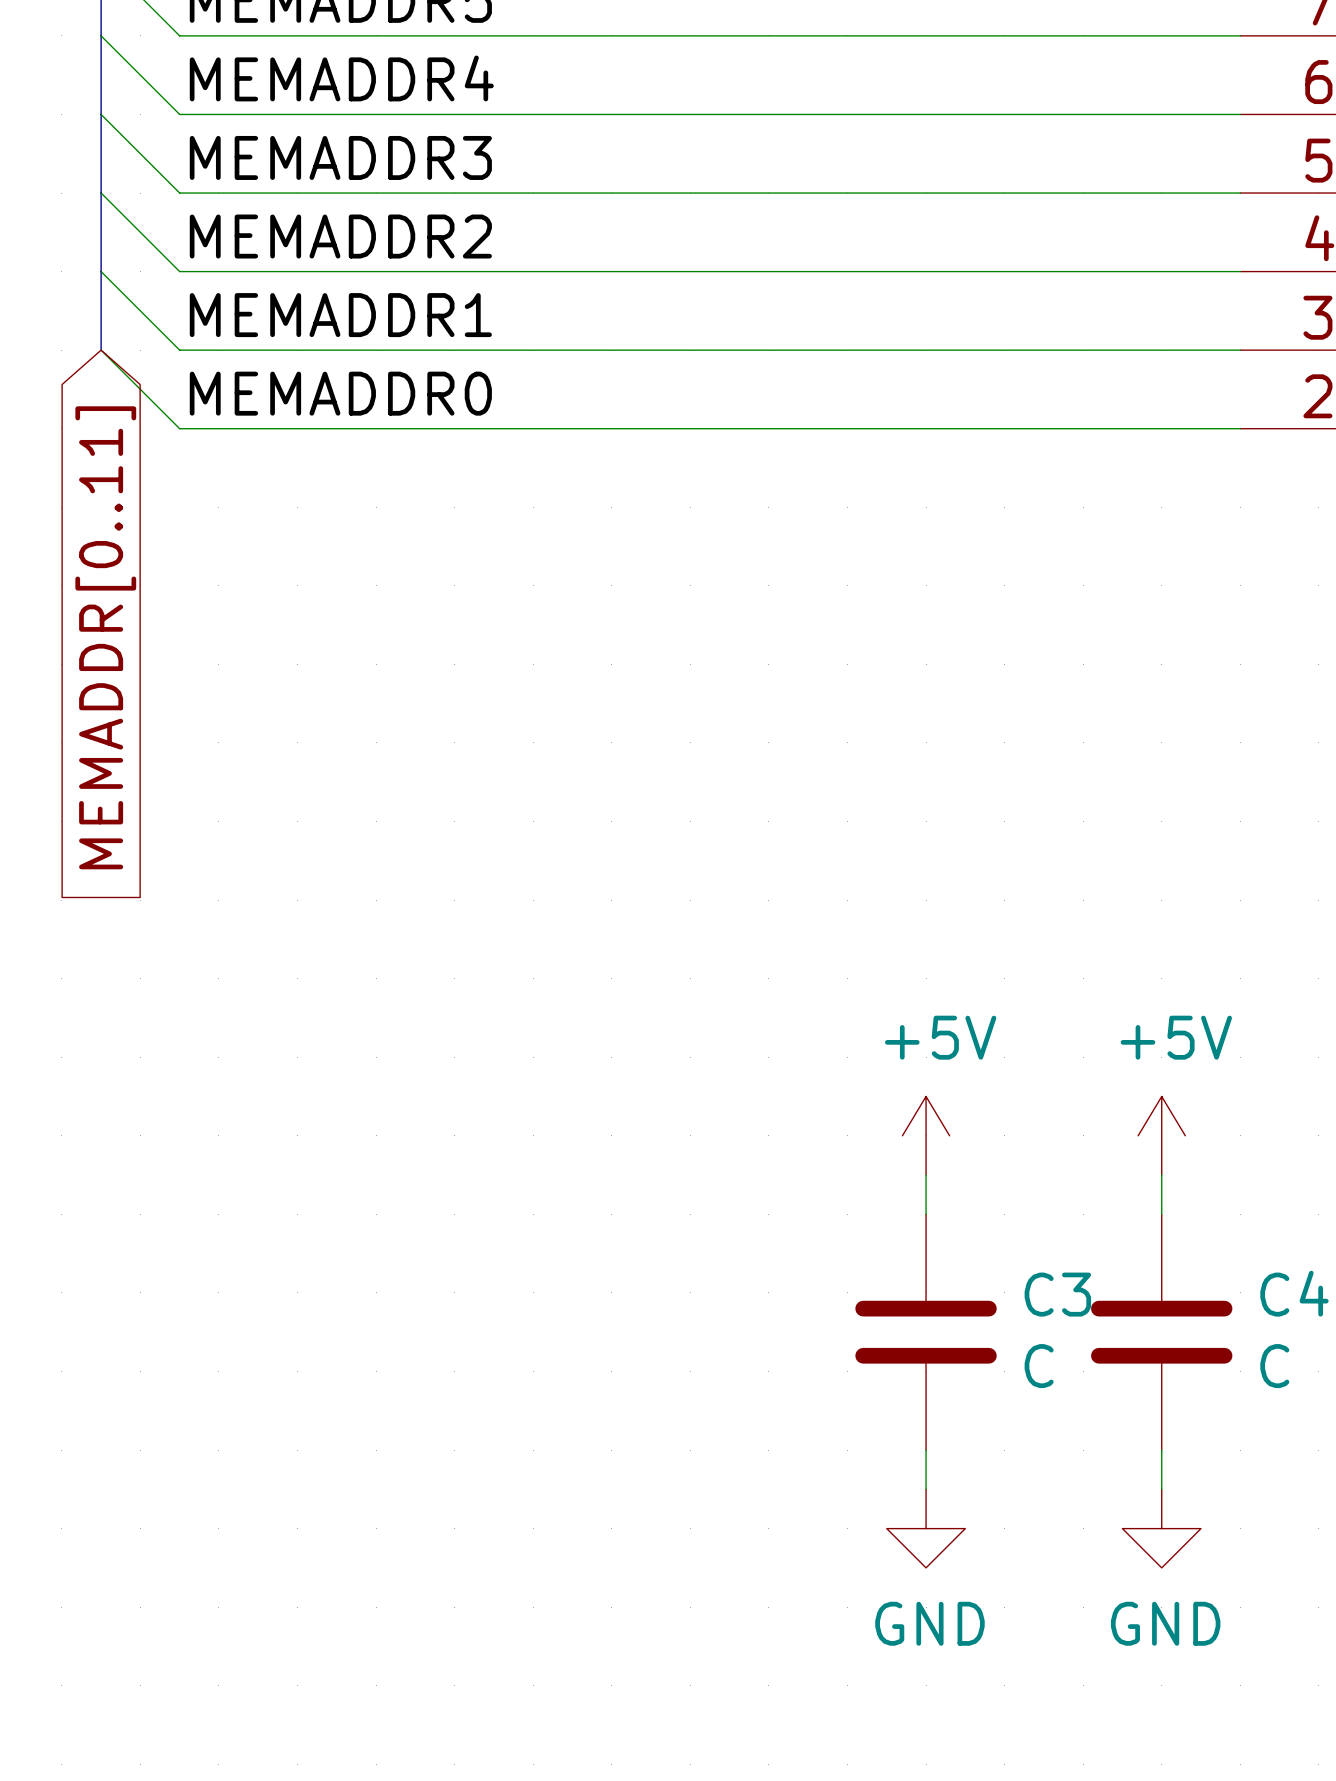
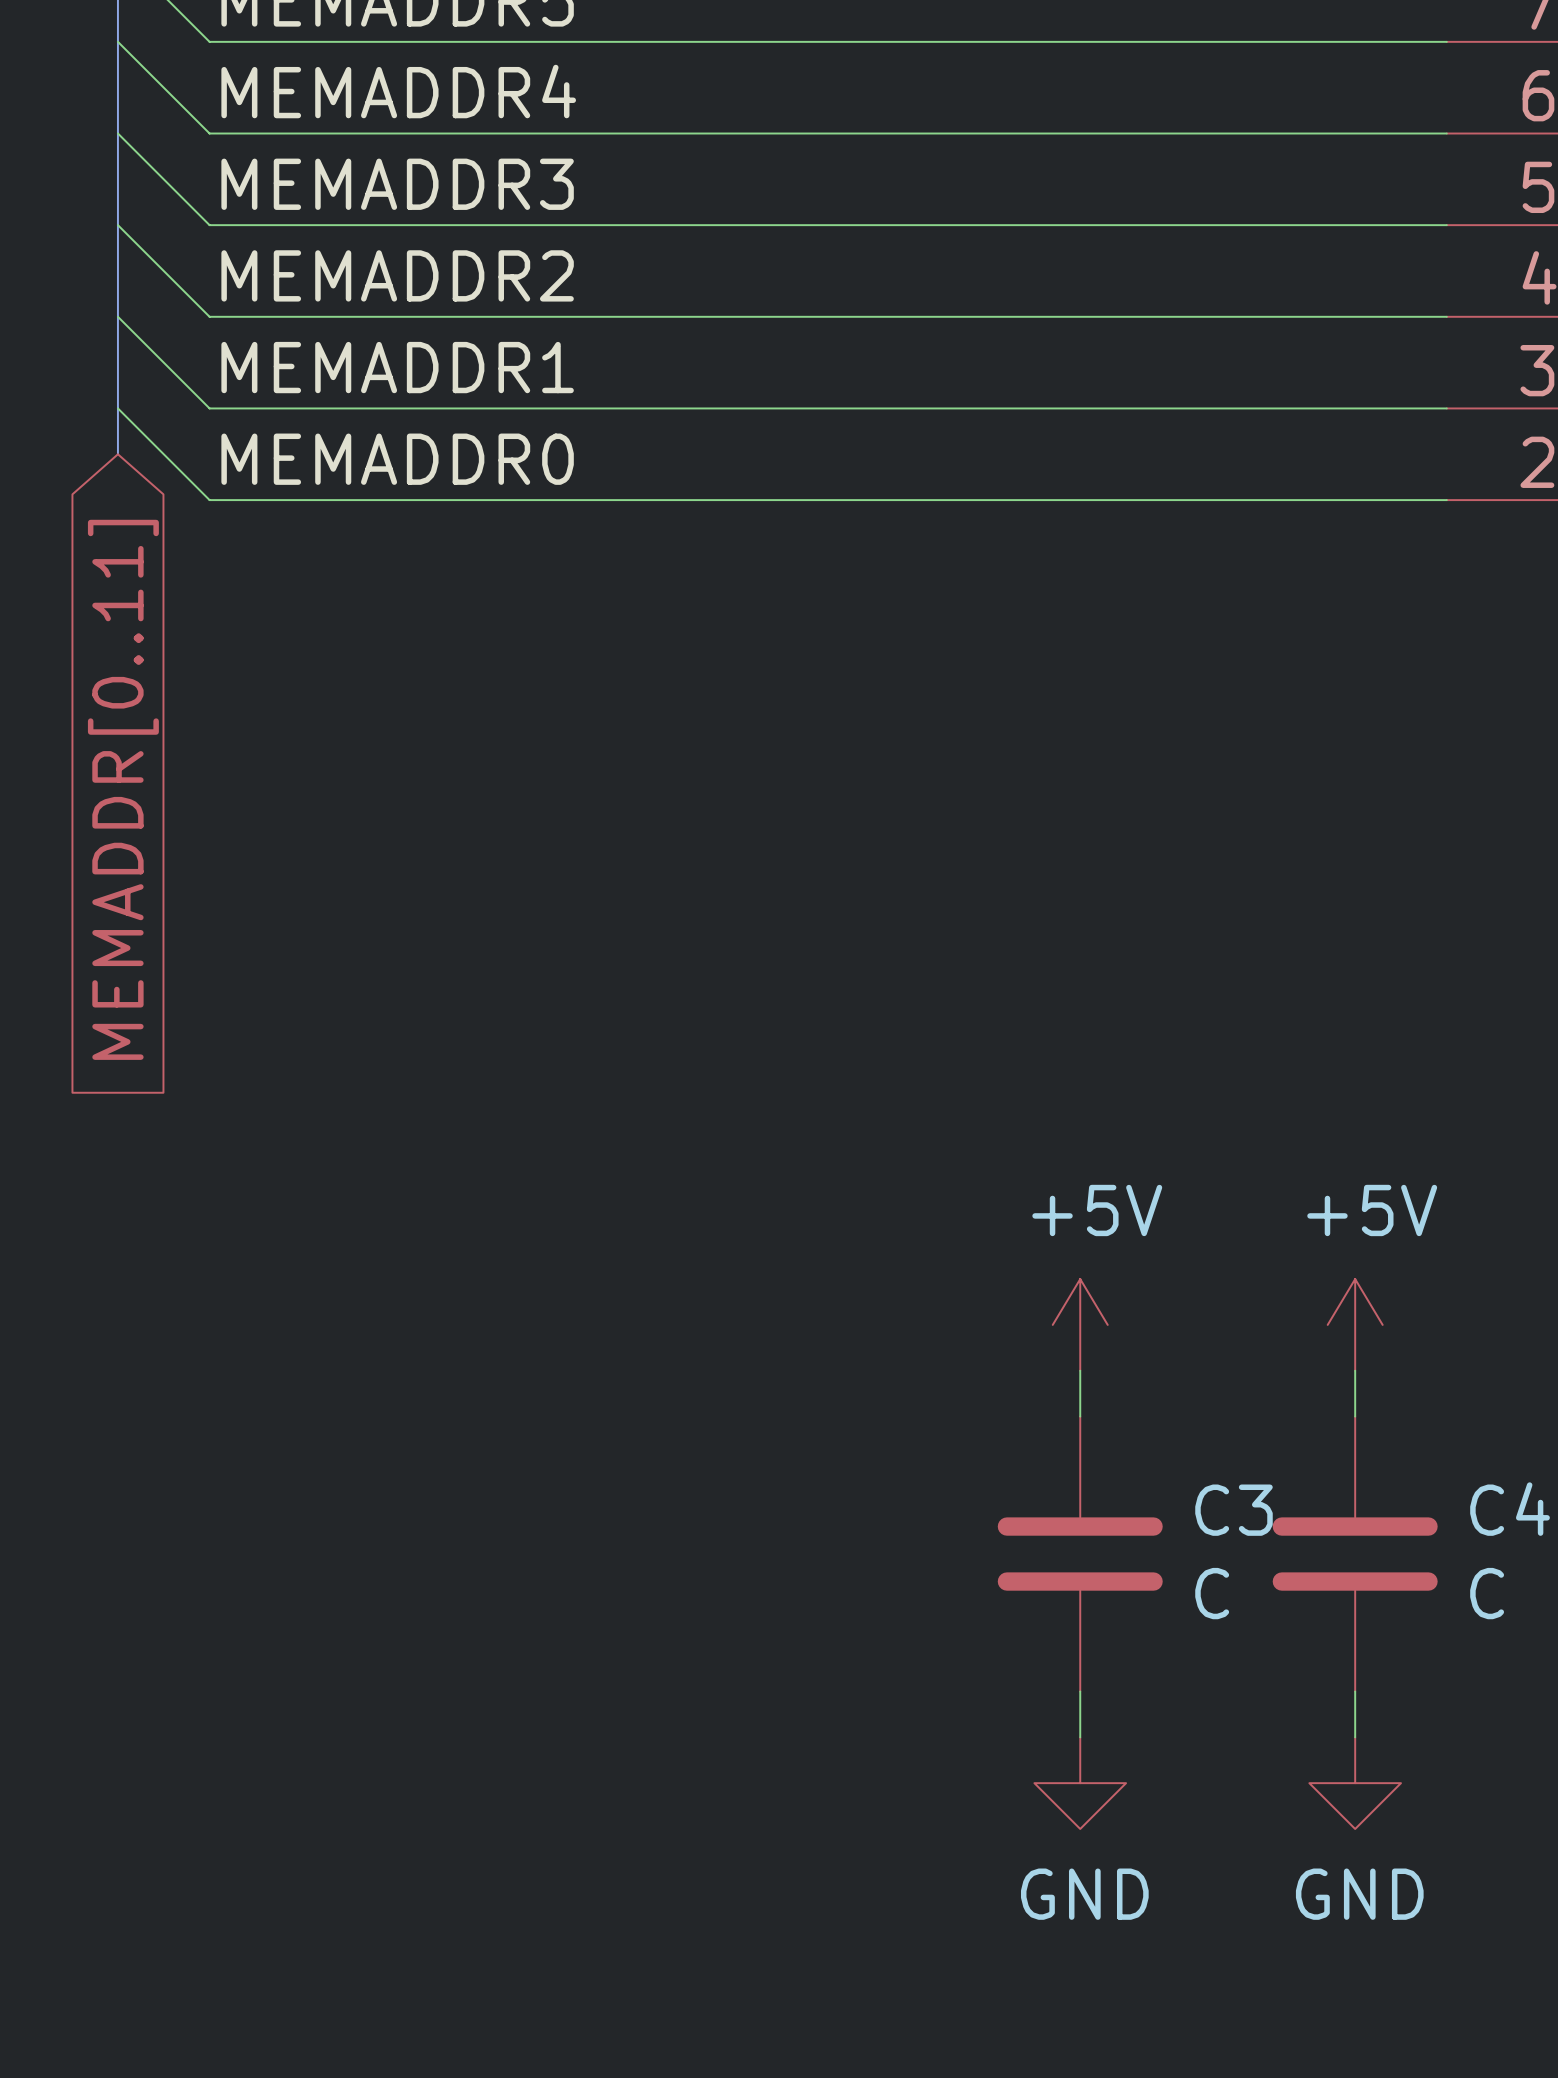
bus: none -> (117, 408) (117, 454)
global label position: MEMADDR[0..11] (105, 637) -> MEMADDR[0..11] (123, 789)

